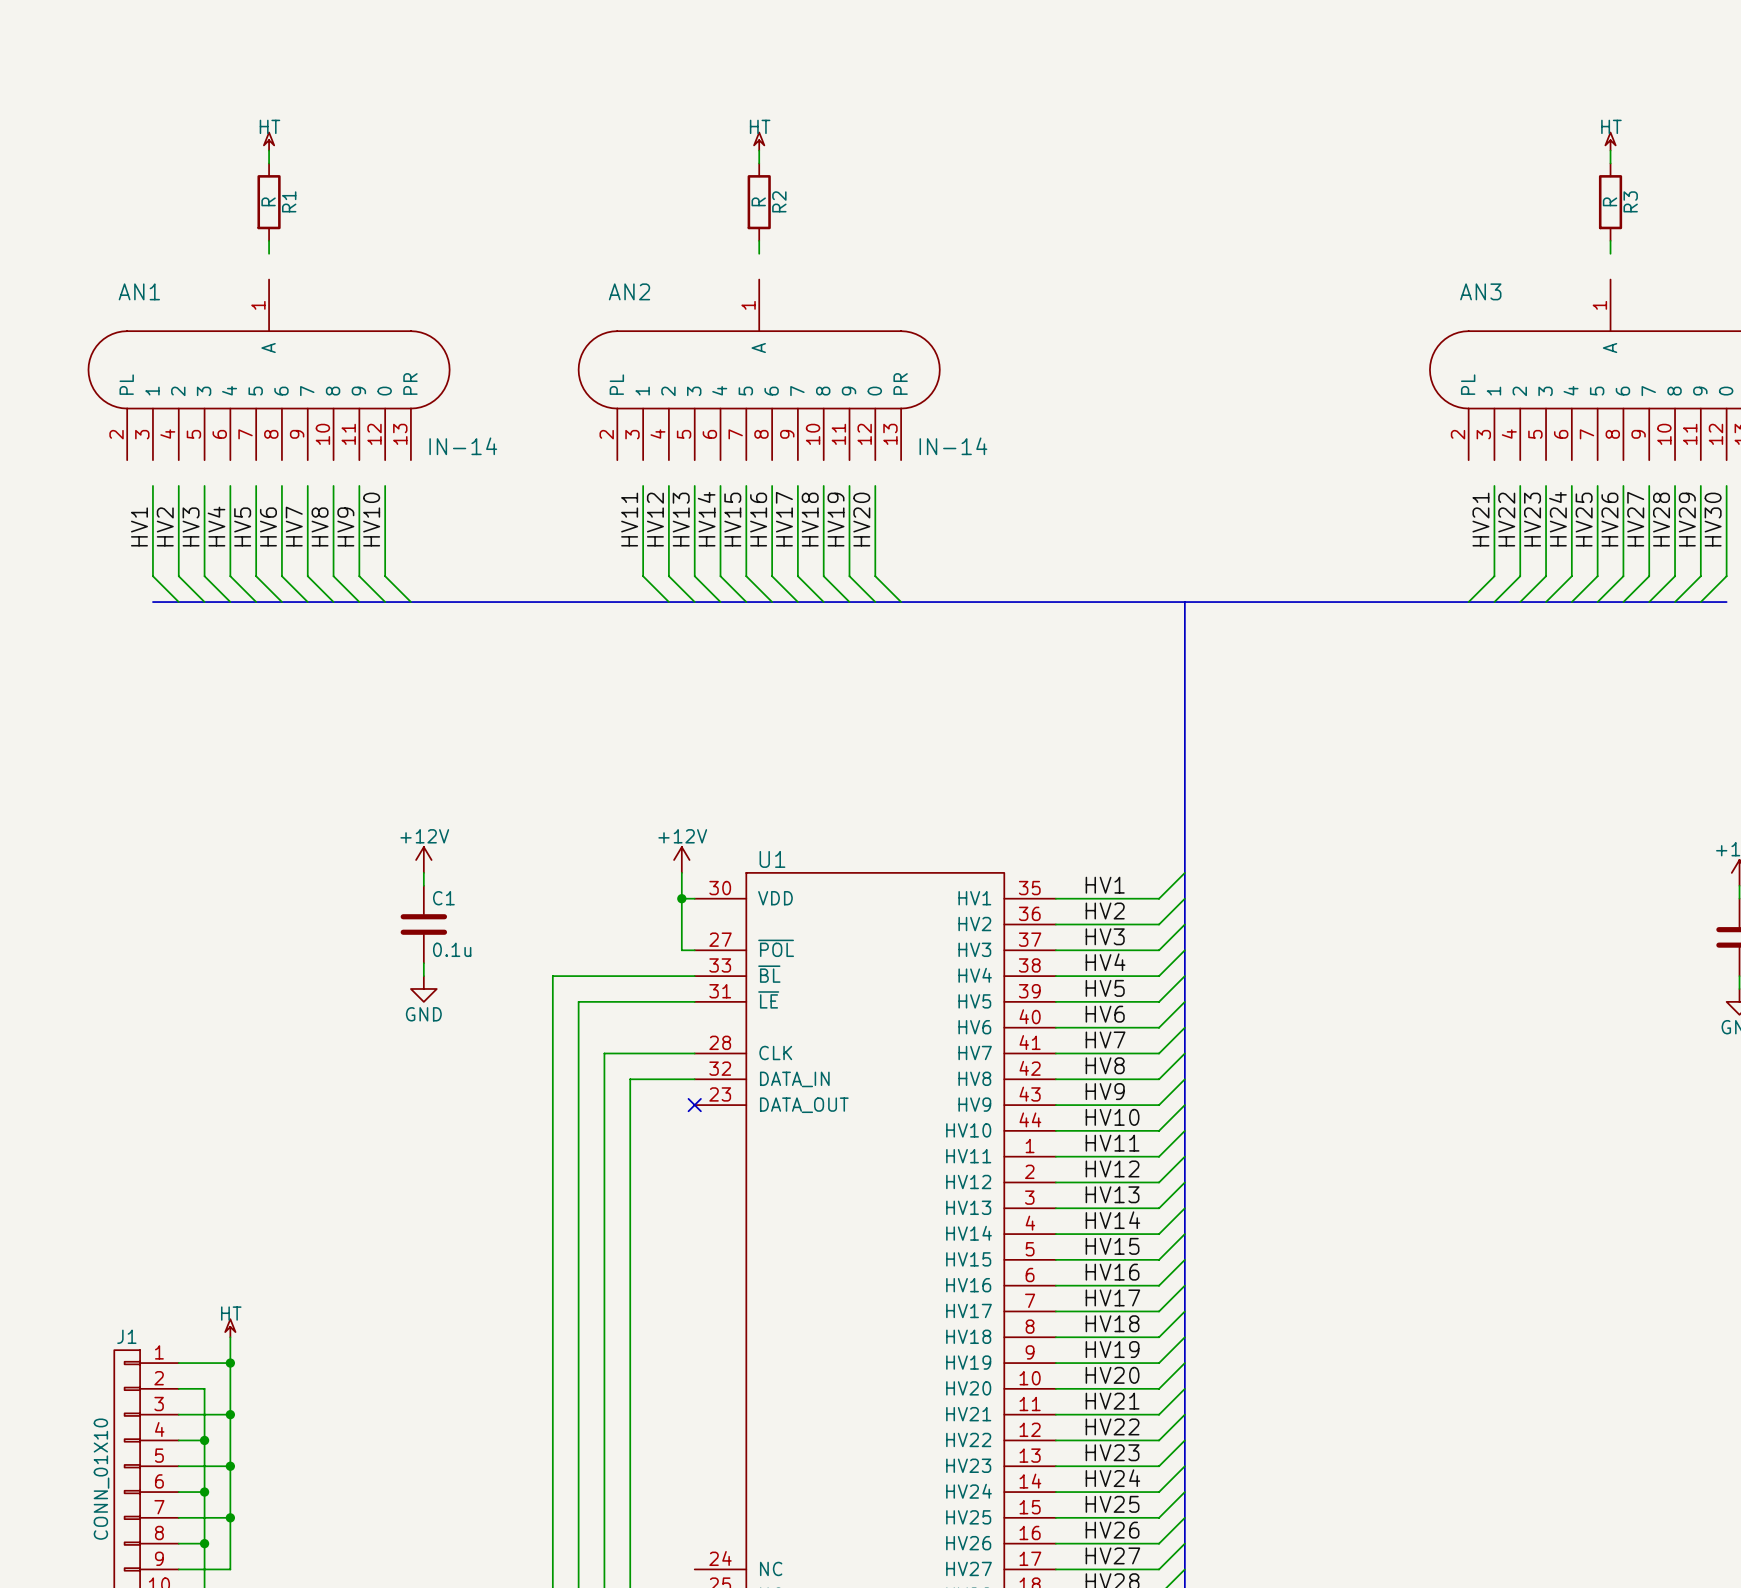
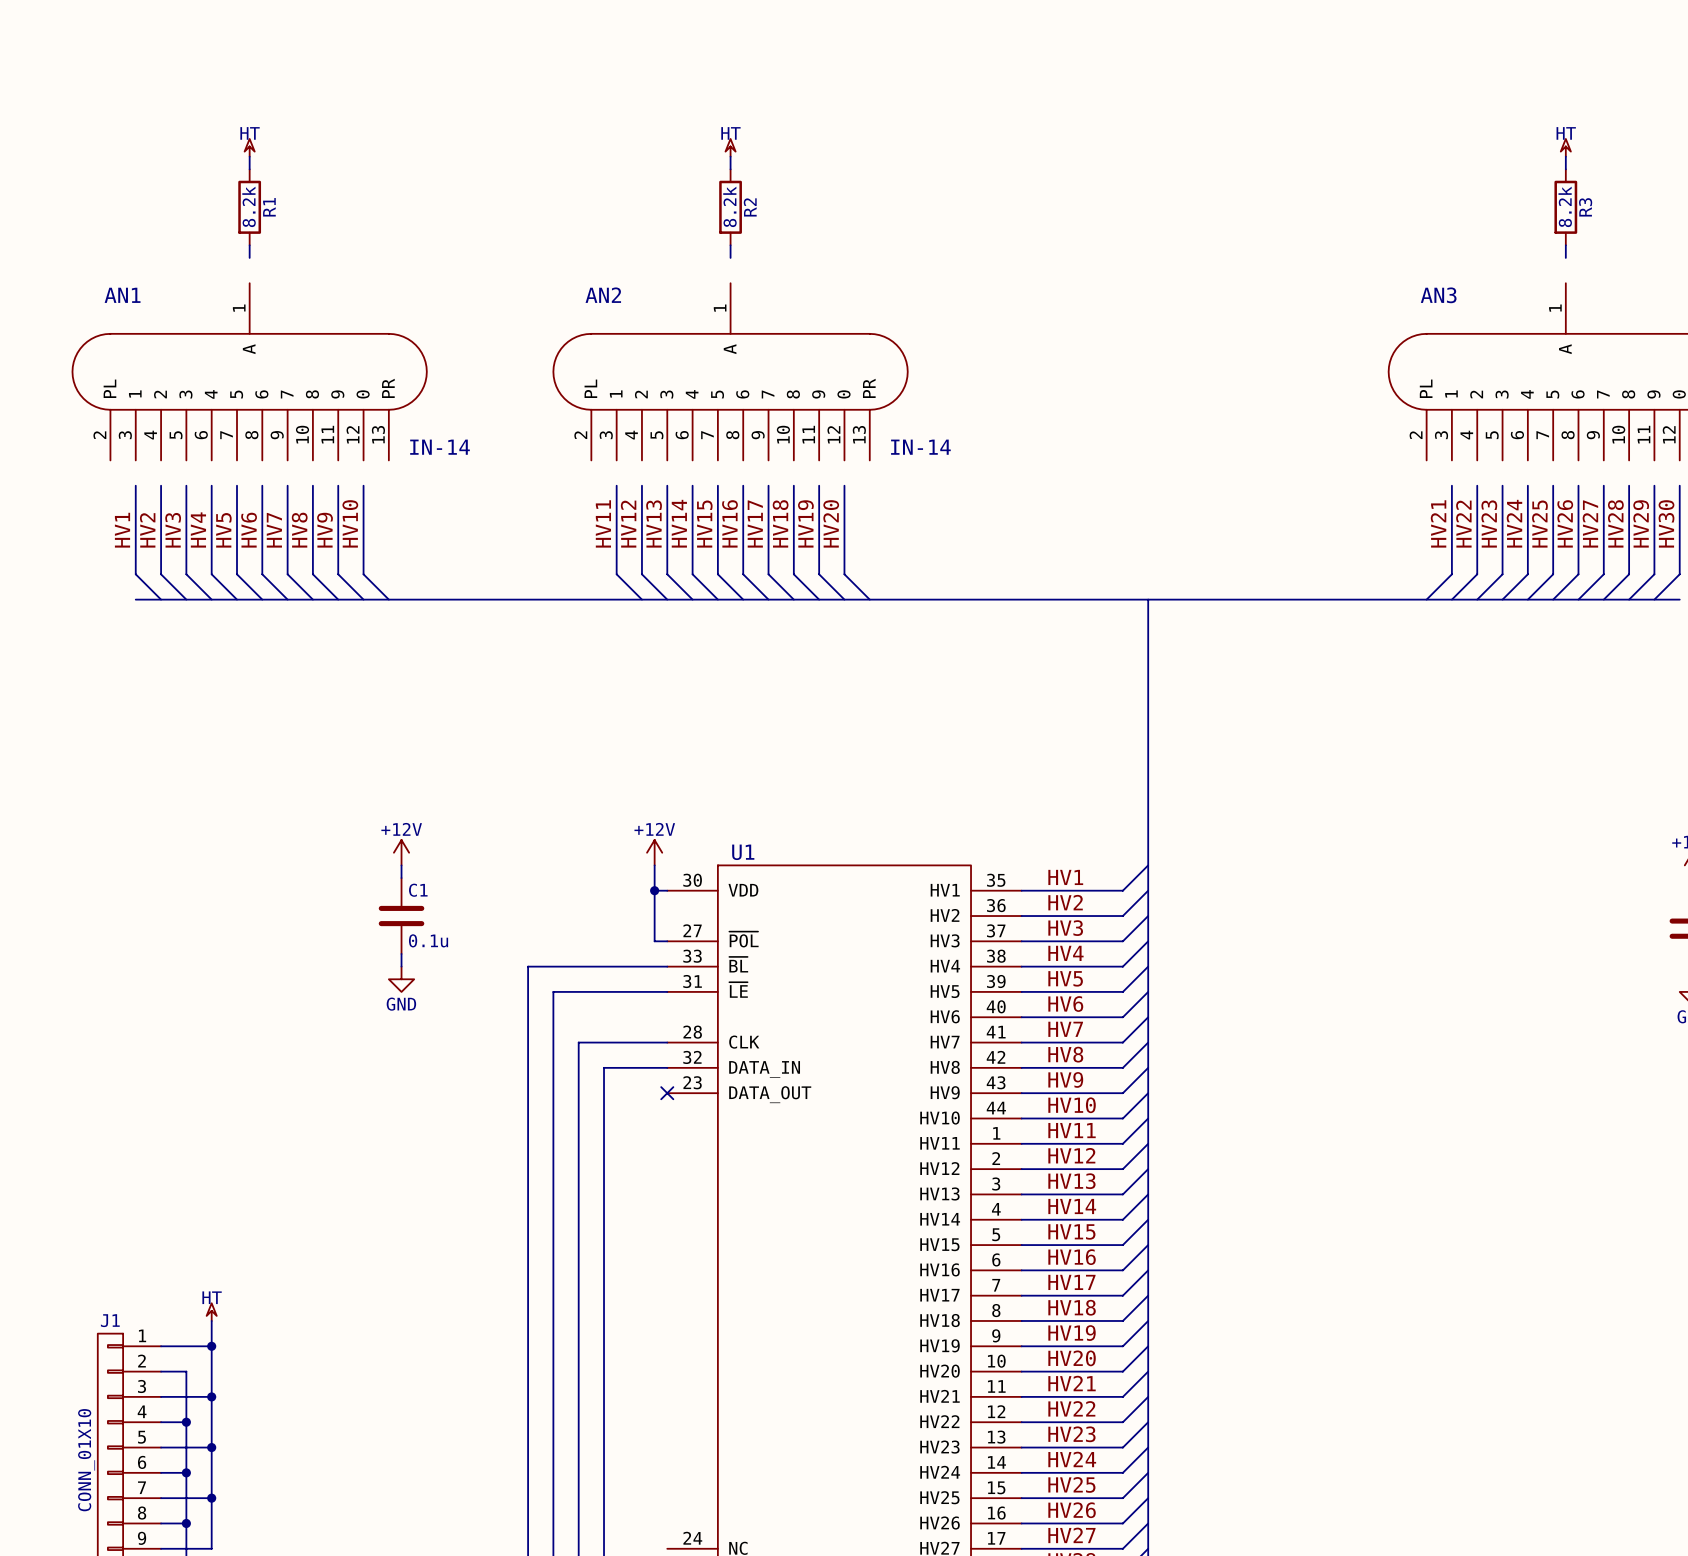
R1 value: R (268, 201) -> 8.2k (249, 206)
R2 value: R (758, 201) -> 8.2k (729, 206)
R3 value: R (1610, 201) -> 8.2k (1565, 206)

